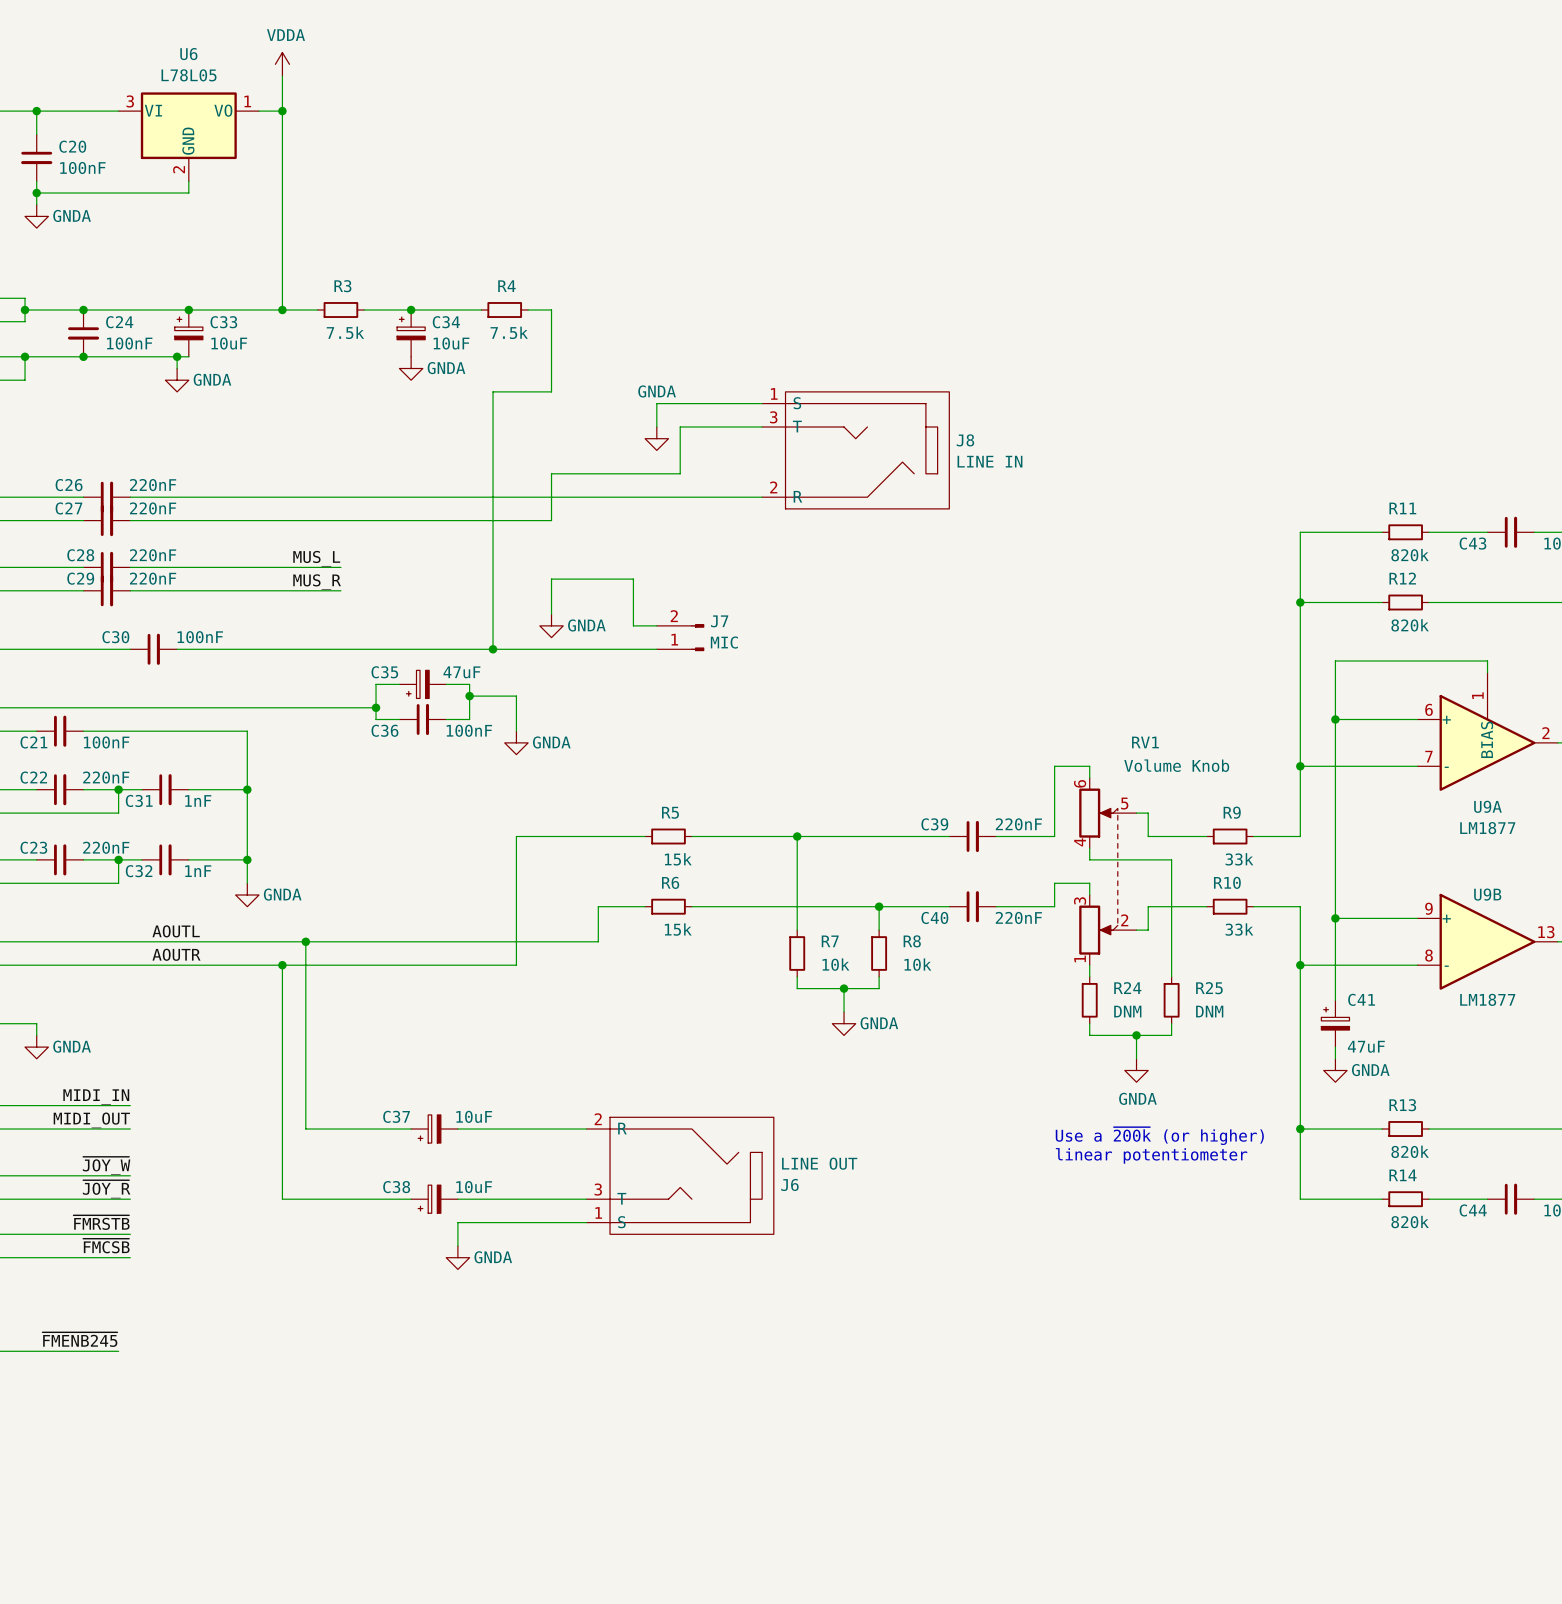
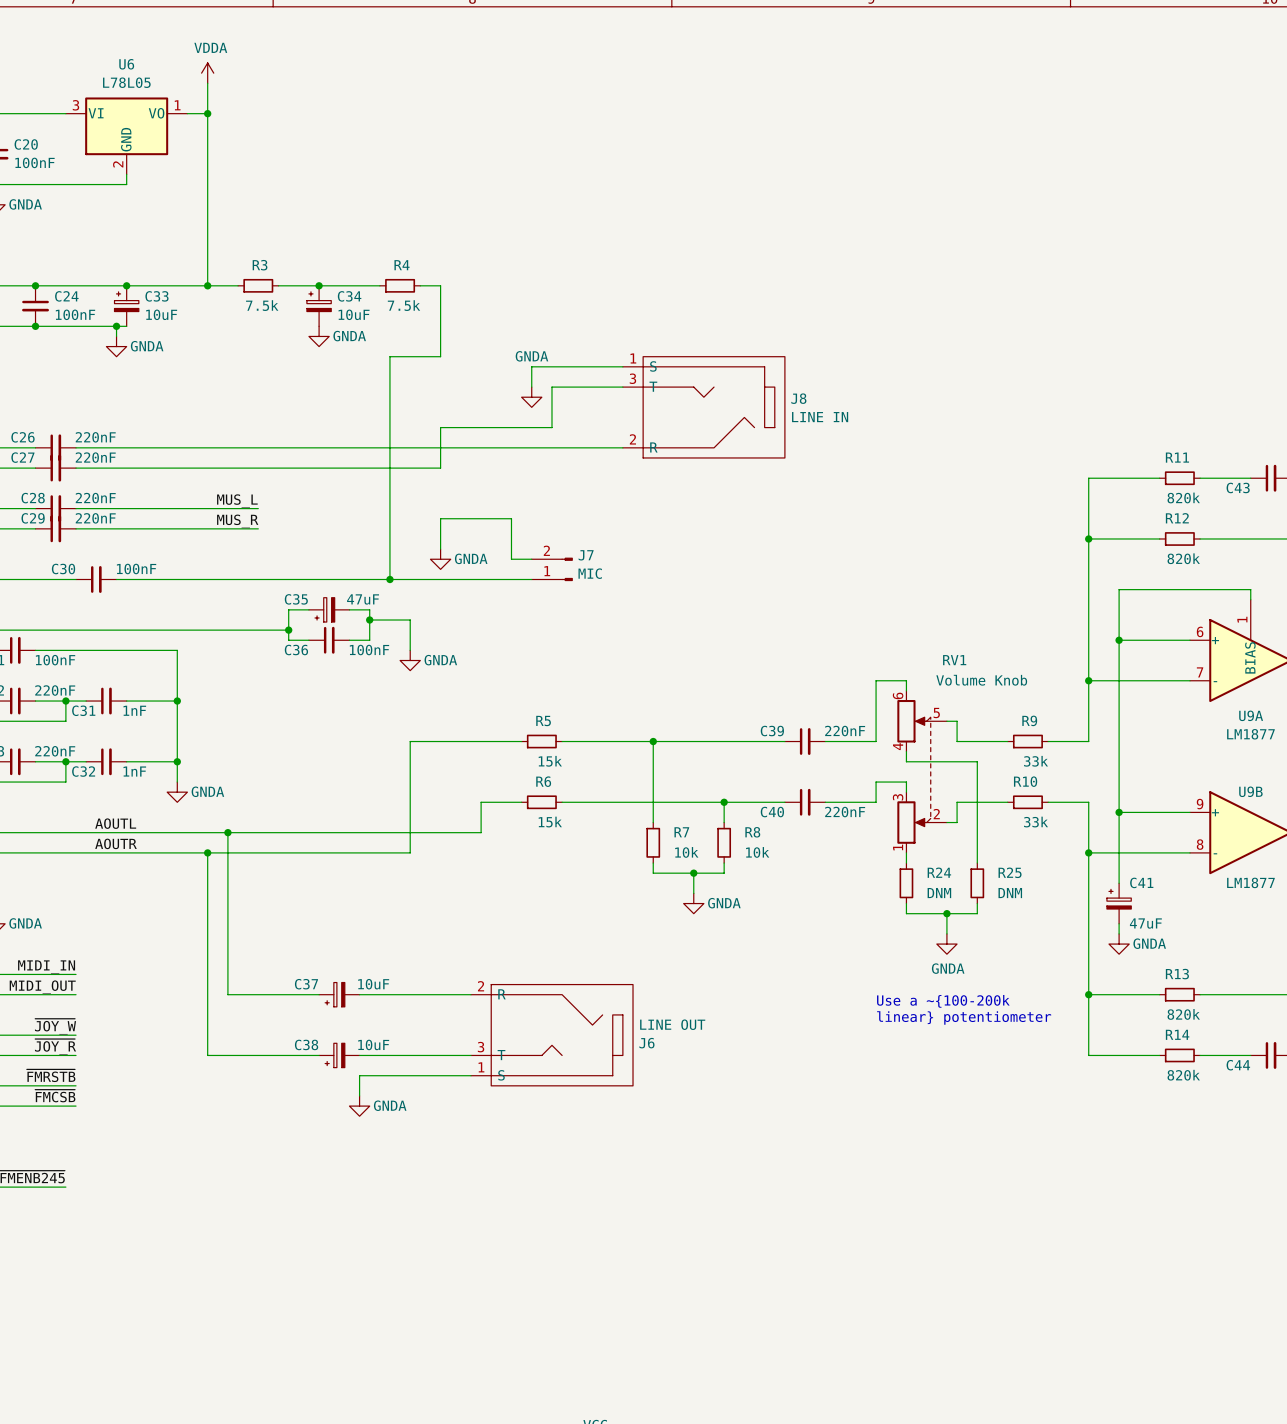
text: Use a ~{200k} (or higher) (1159, 1136) -> Use a ~{100-200k (943, 1001)
text: linear potentiometer (1151, 1155) -> linear} potentiometer (964, 1017)

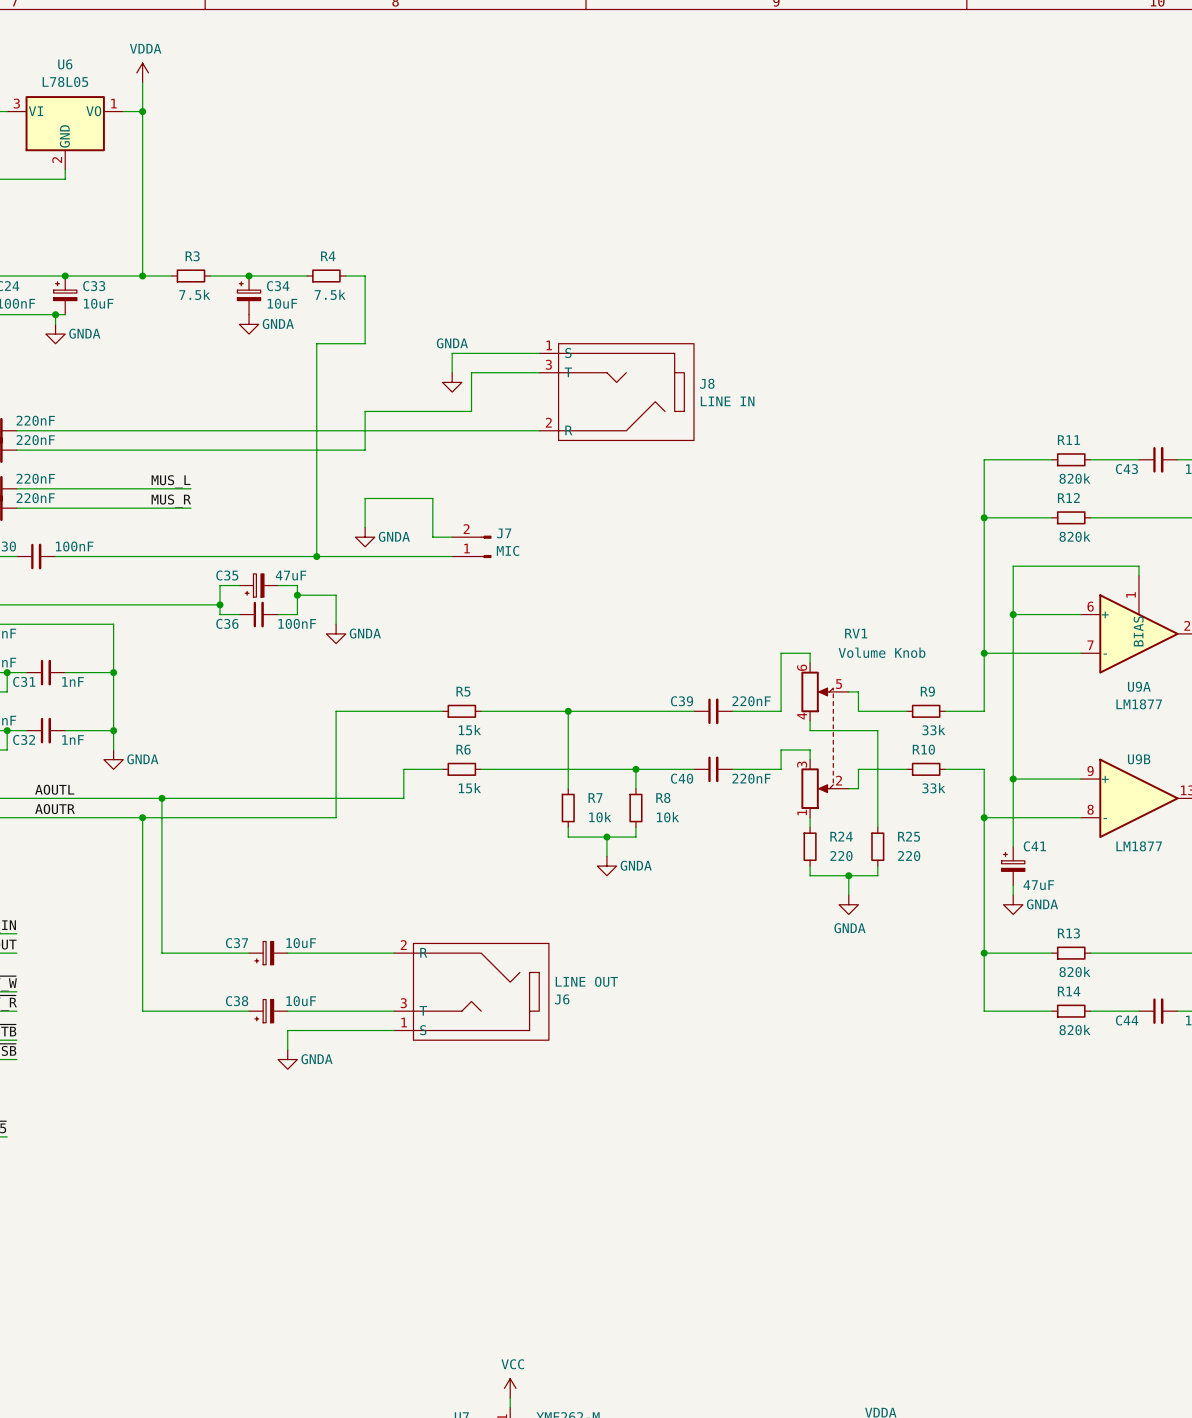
R24 value: DNM (939, 893) -> 220 (841, 856)
R25 value: DNM (1010, 893) -> 220 (909, 856)
text: Use a ~{100-200k (943, 1001) -> none
text: linear} potentiometer (964, 1017) -> none

